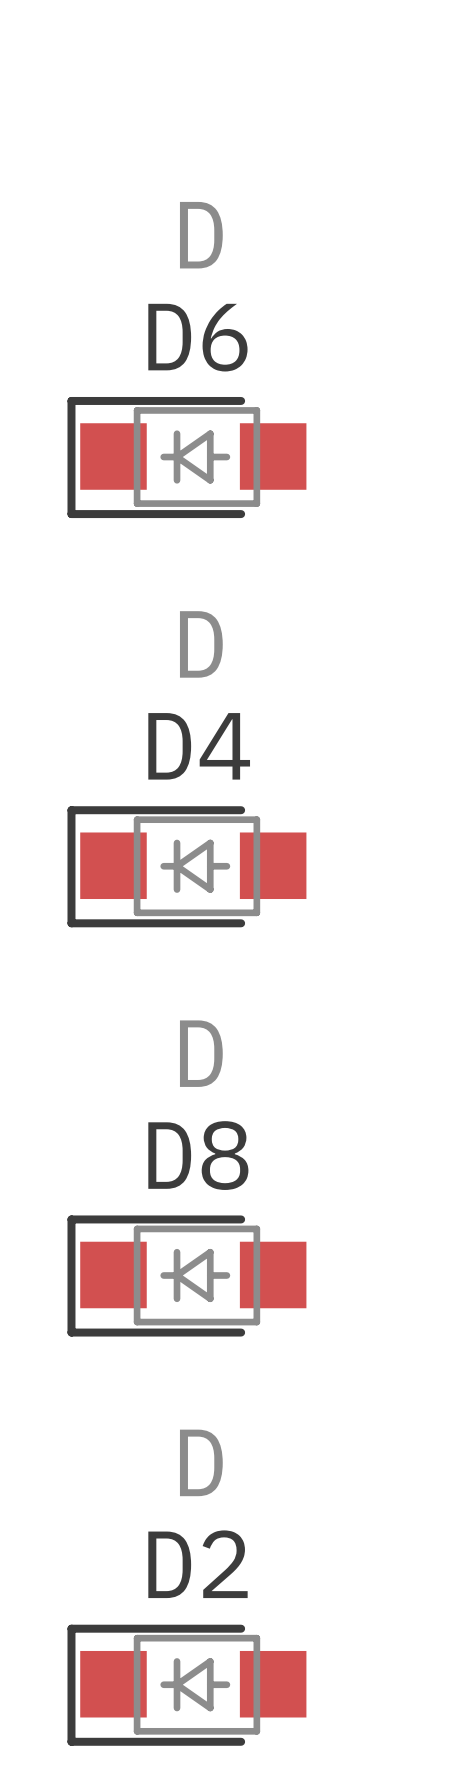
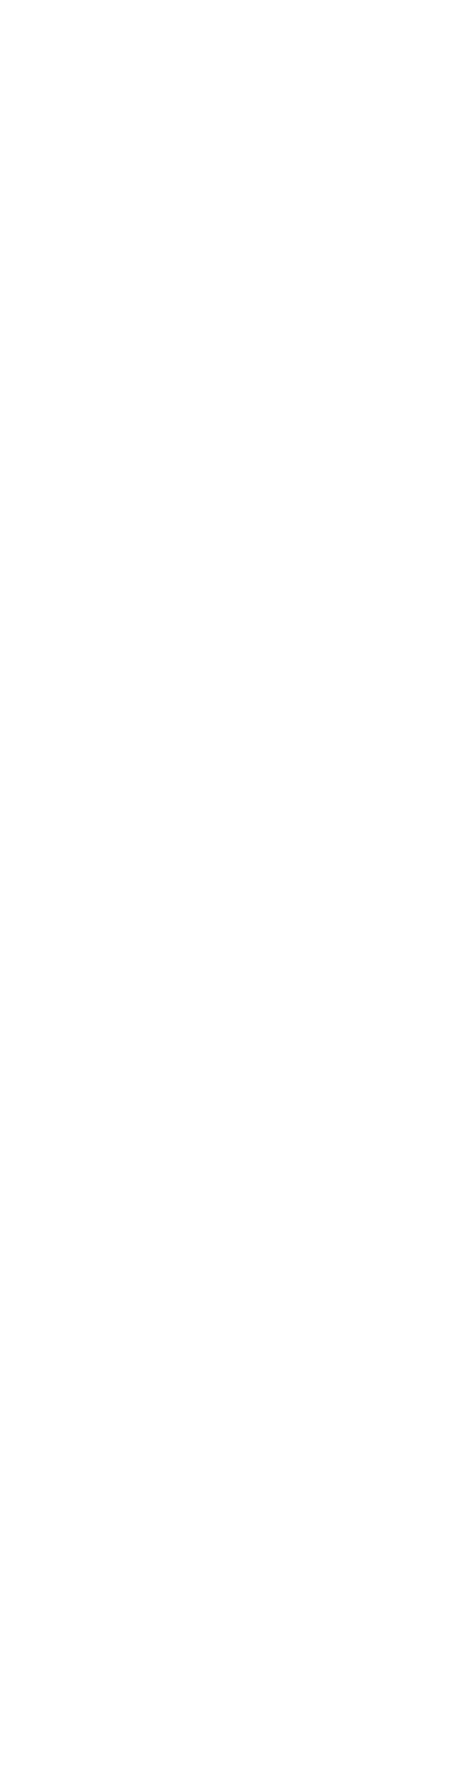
D6: D (186, 457) -> none
D4: D (186, 866) -> none
D8: D (186, 1276) -> none
D2: D (186, 1685) -> none

